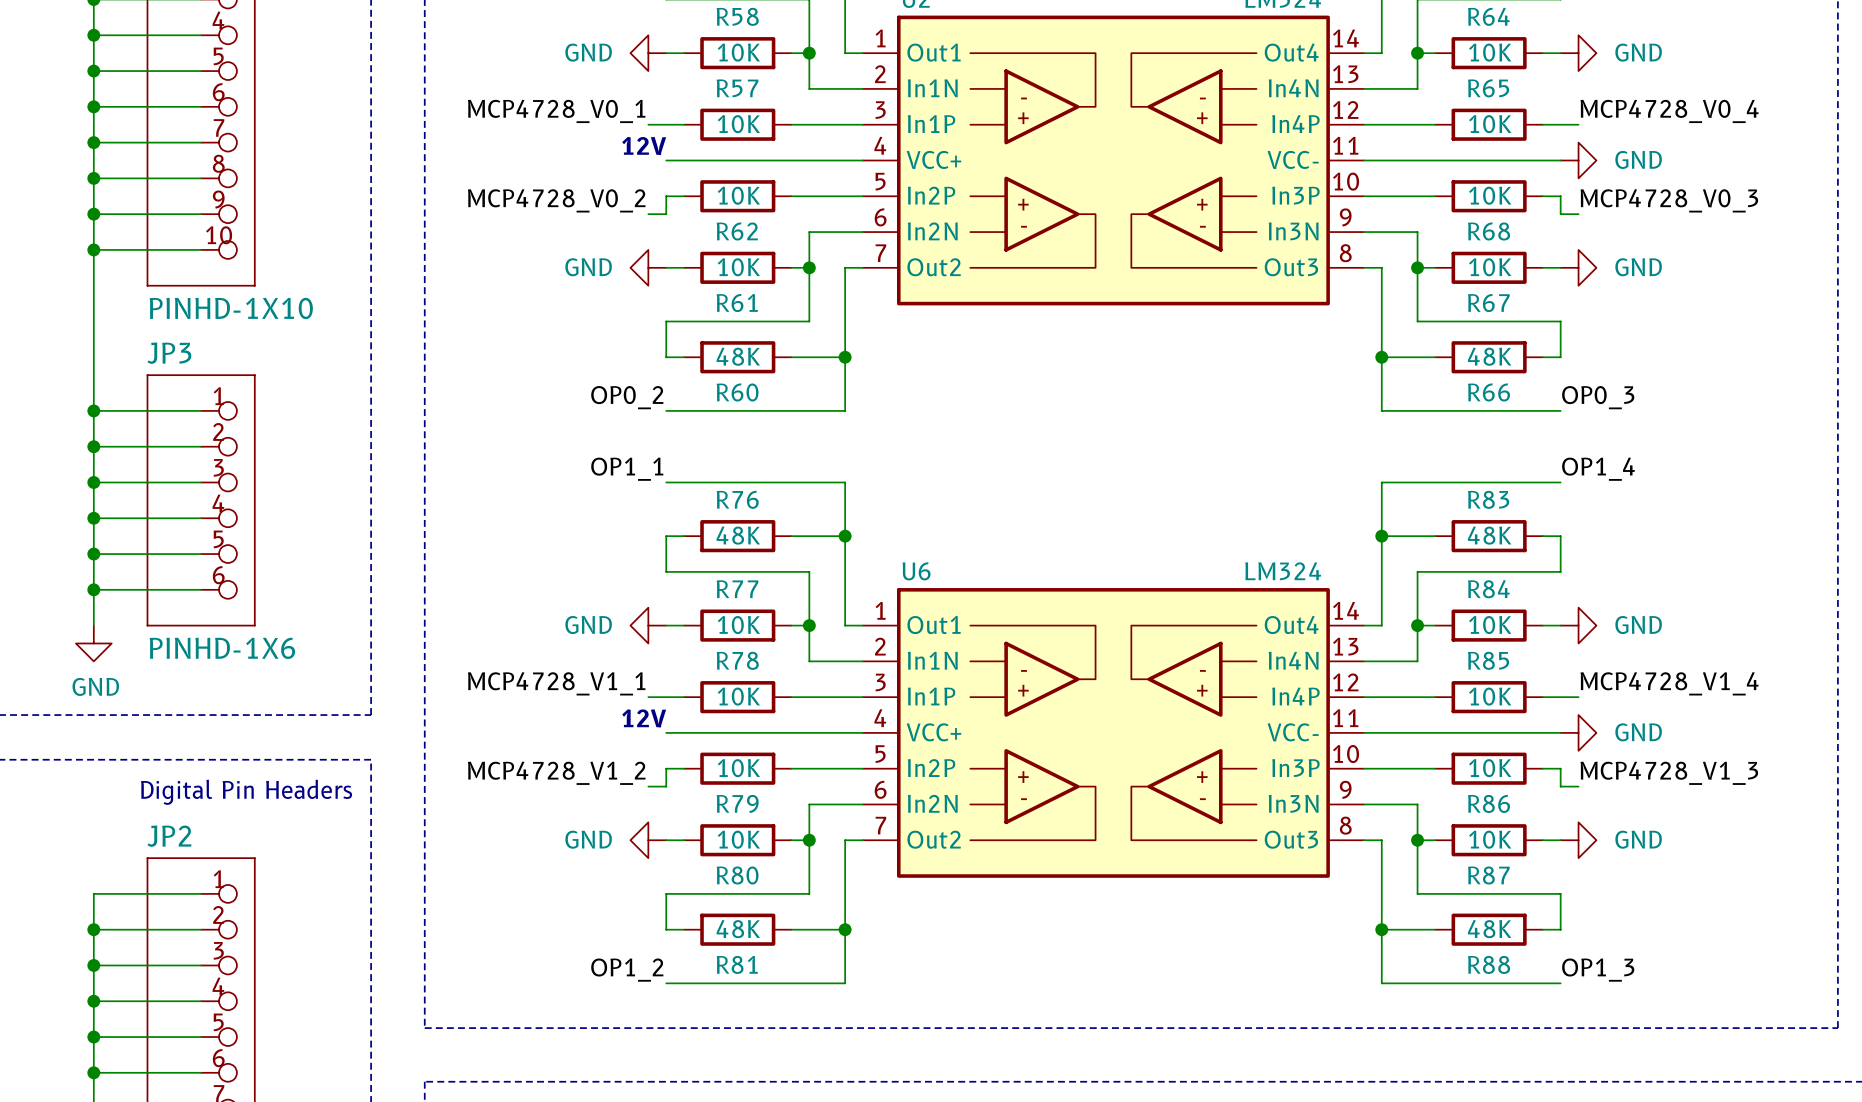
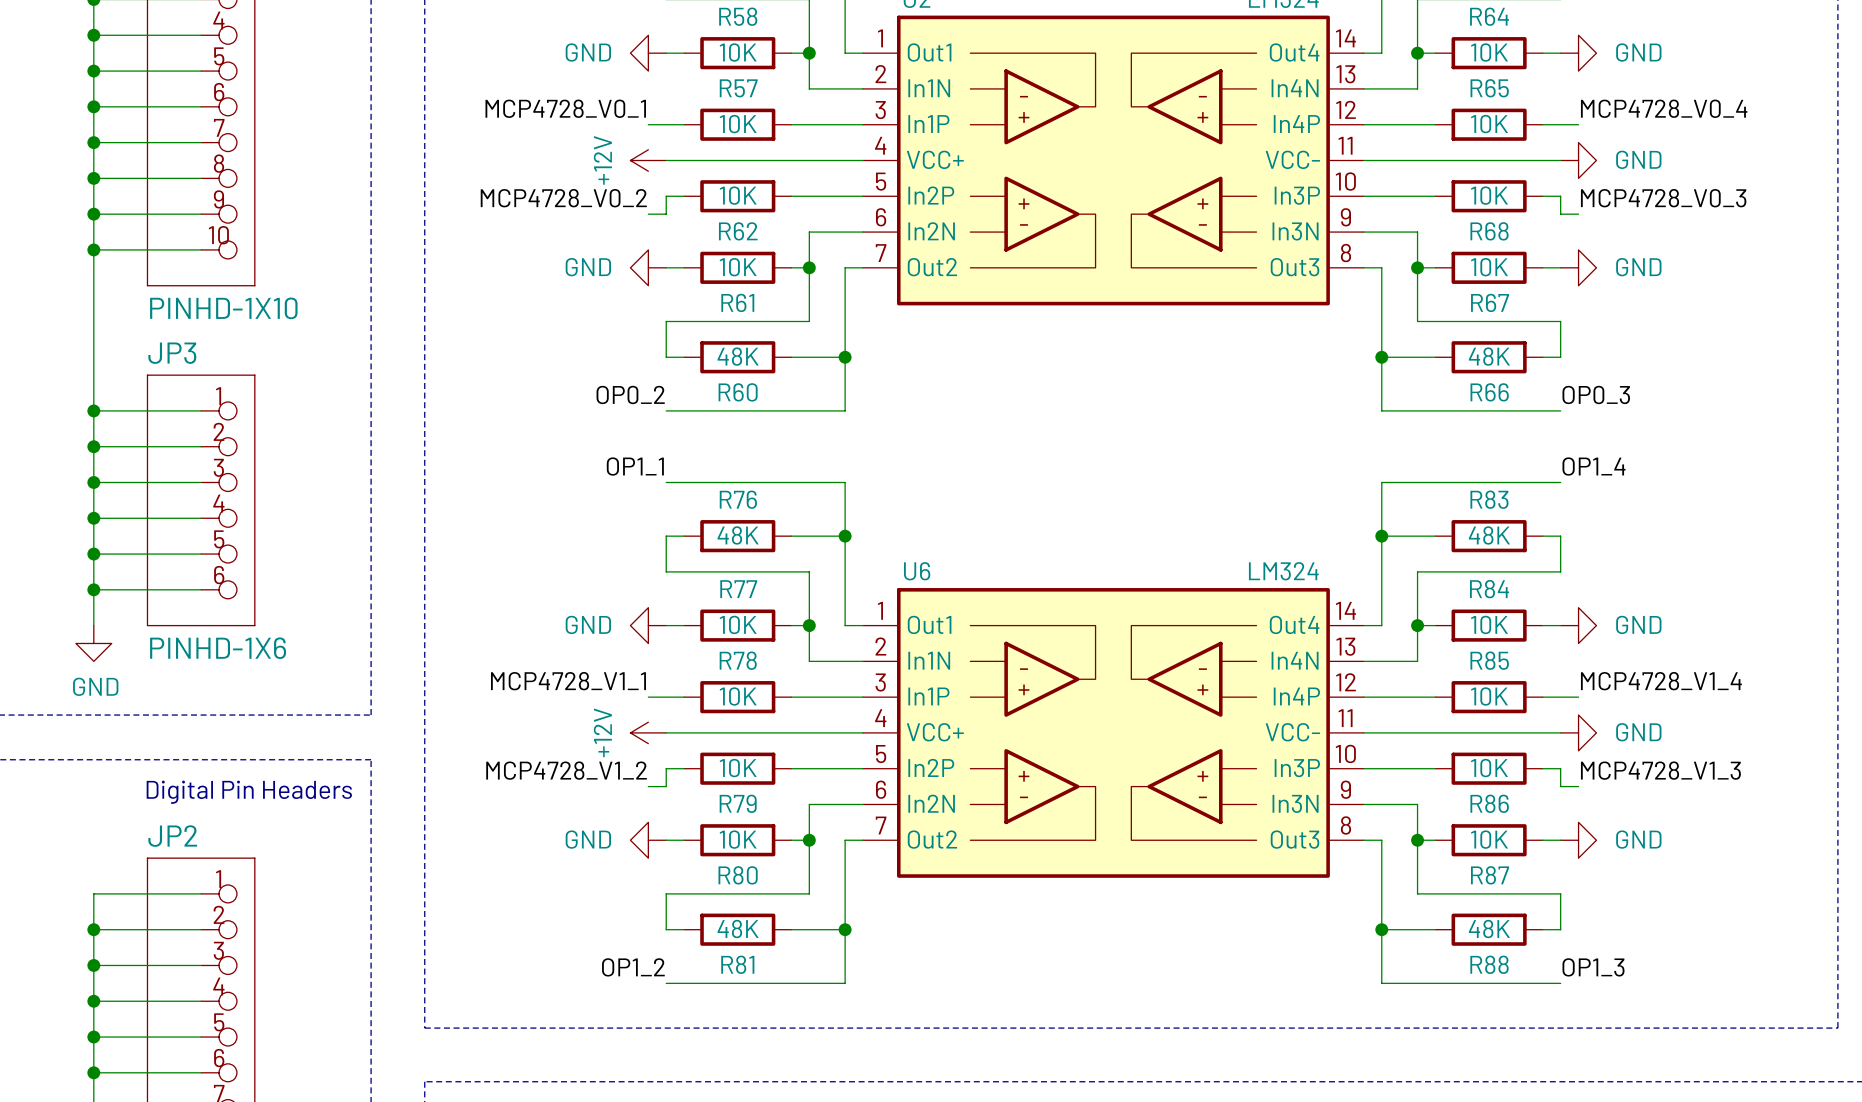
text: 12V (644, 145) -> none
power symbol: none -> +12V (648, 160)
text: 12V (644, 718) -> none
power symbol: none -> +12V (648, 732)

